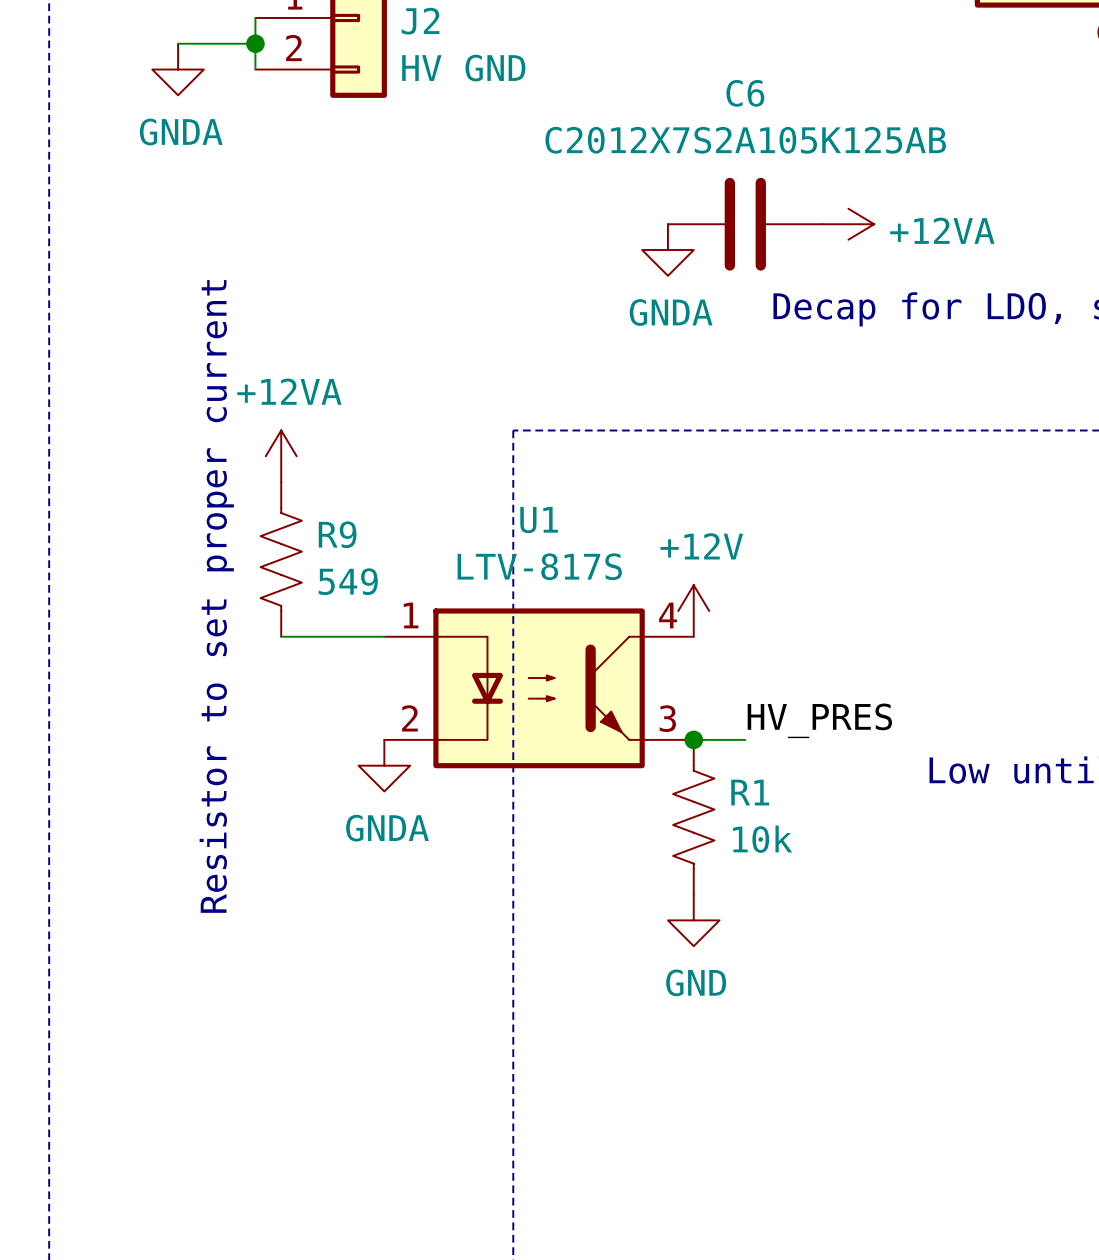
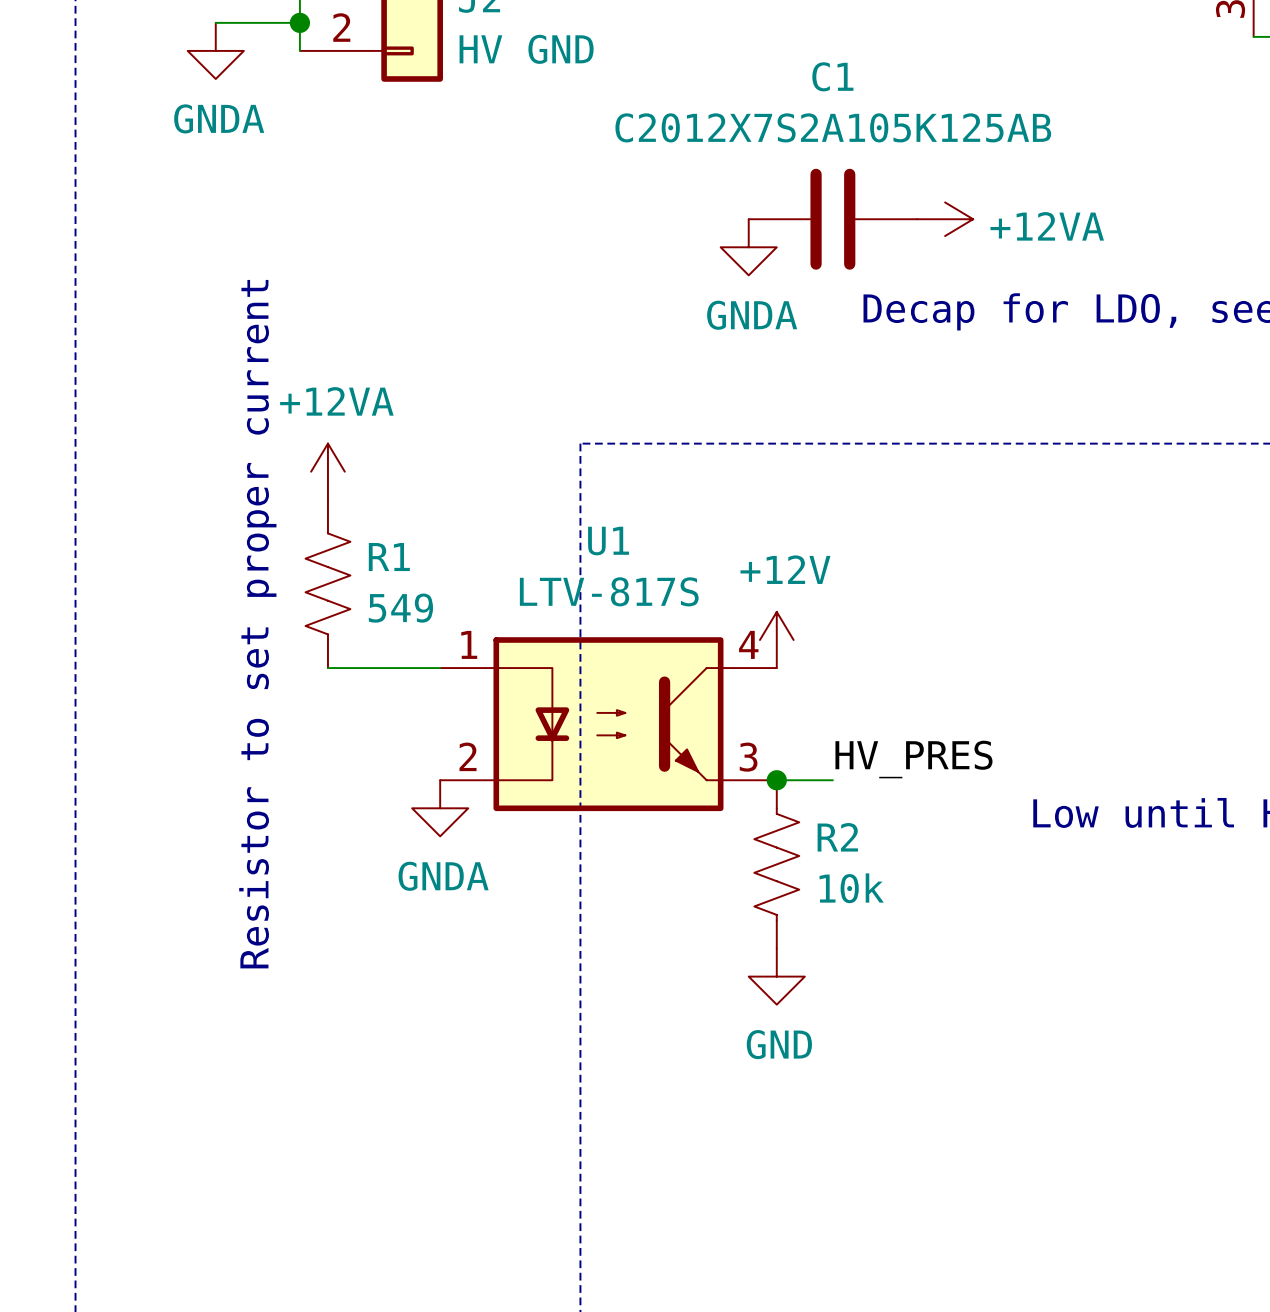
C6 name: C6 (745, 93) -> C1 (832, 76)
R9 name: R9 (337, 534) -> R1 (389, 557)
R1 name: R1 (750, 792) -> R2 (837, 837)

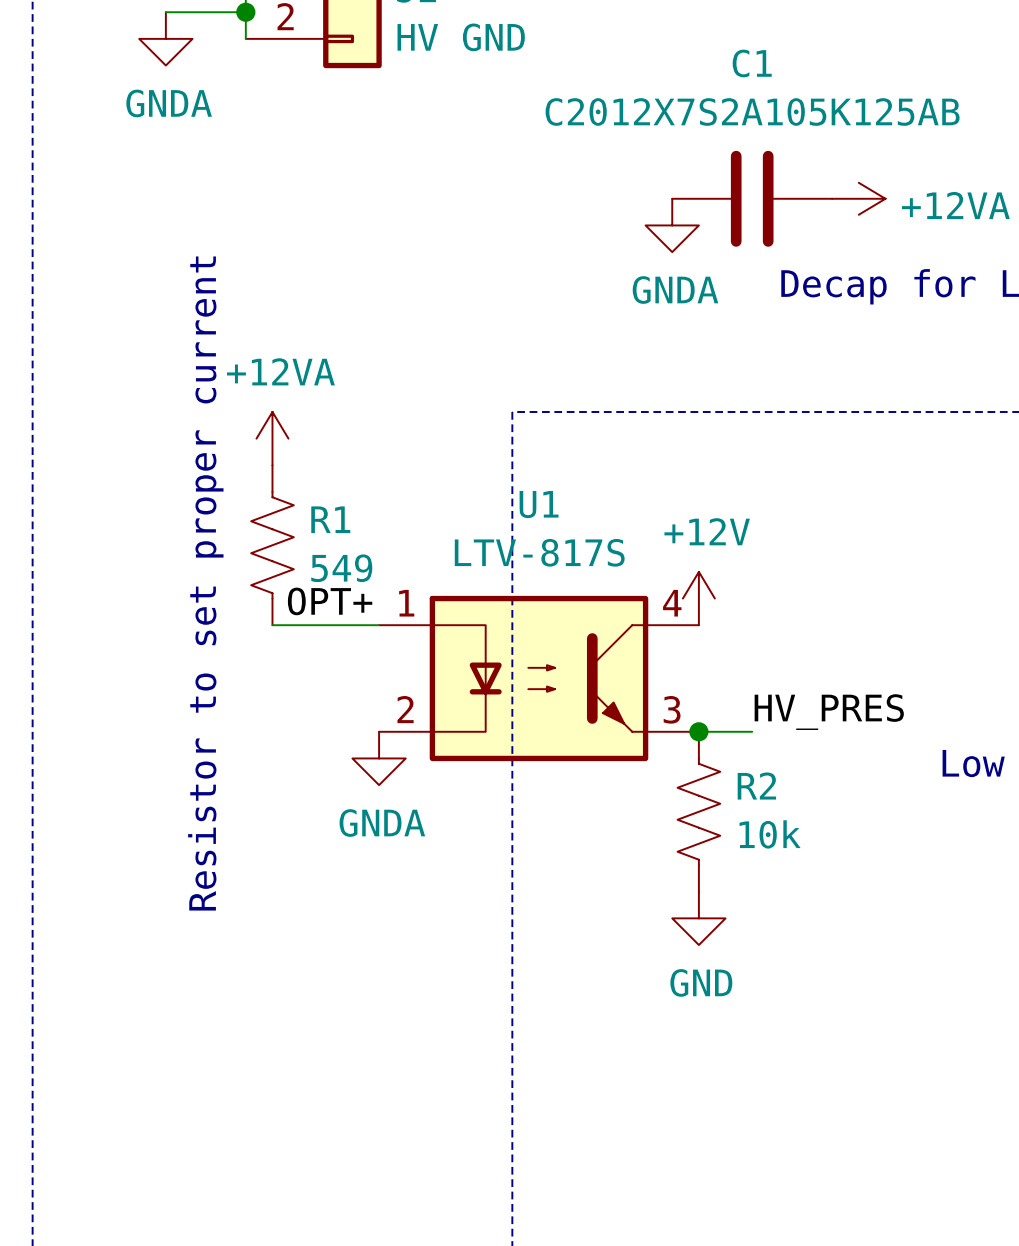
label: none -> OPT+ (330, 601)

